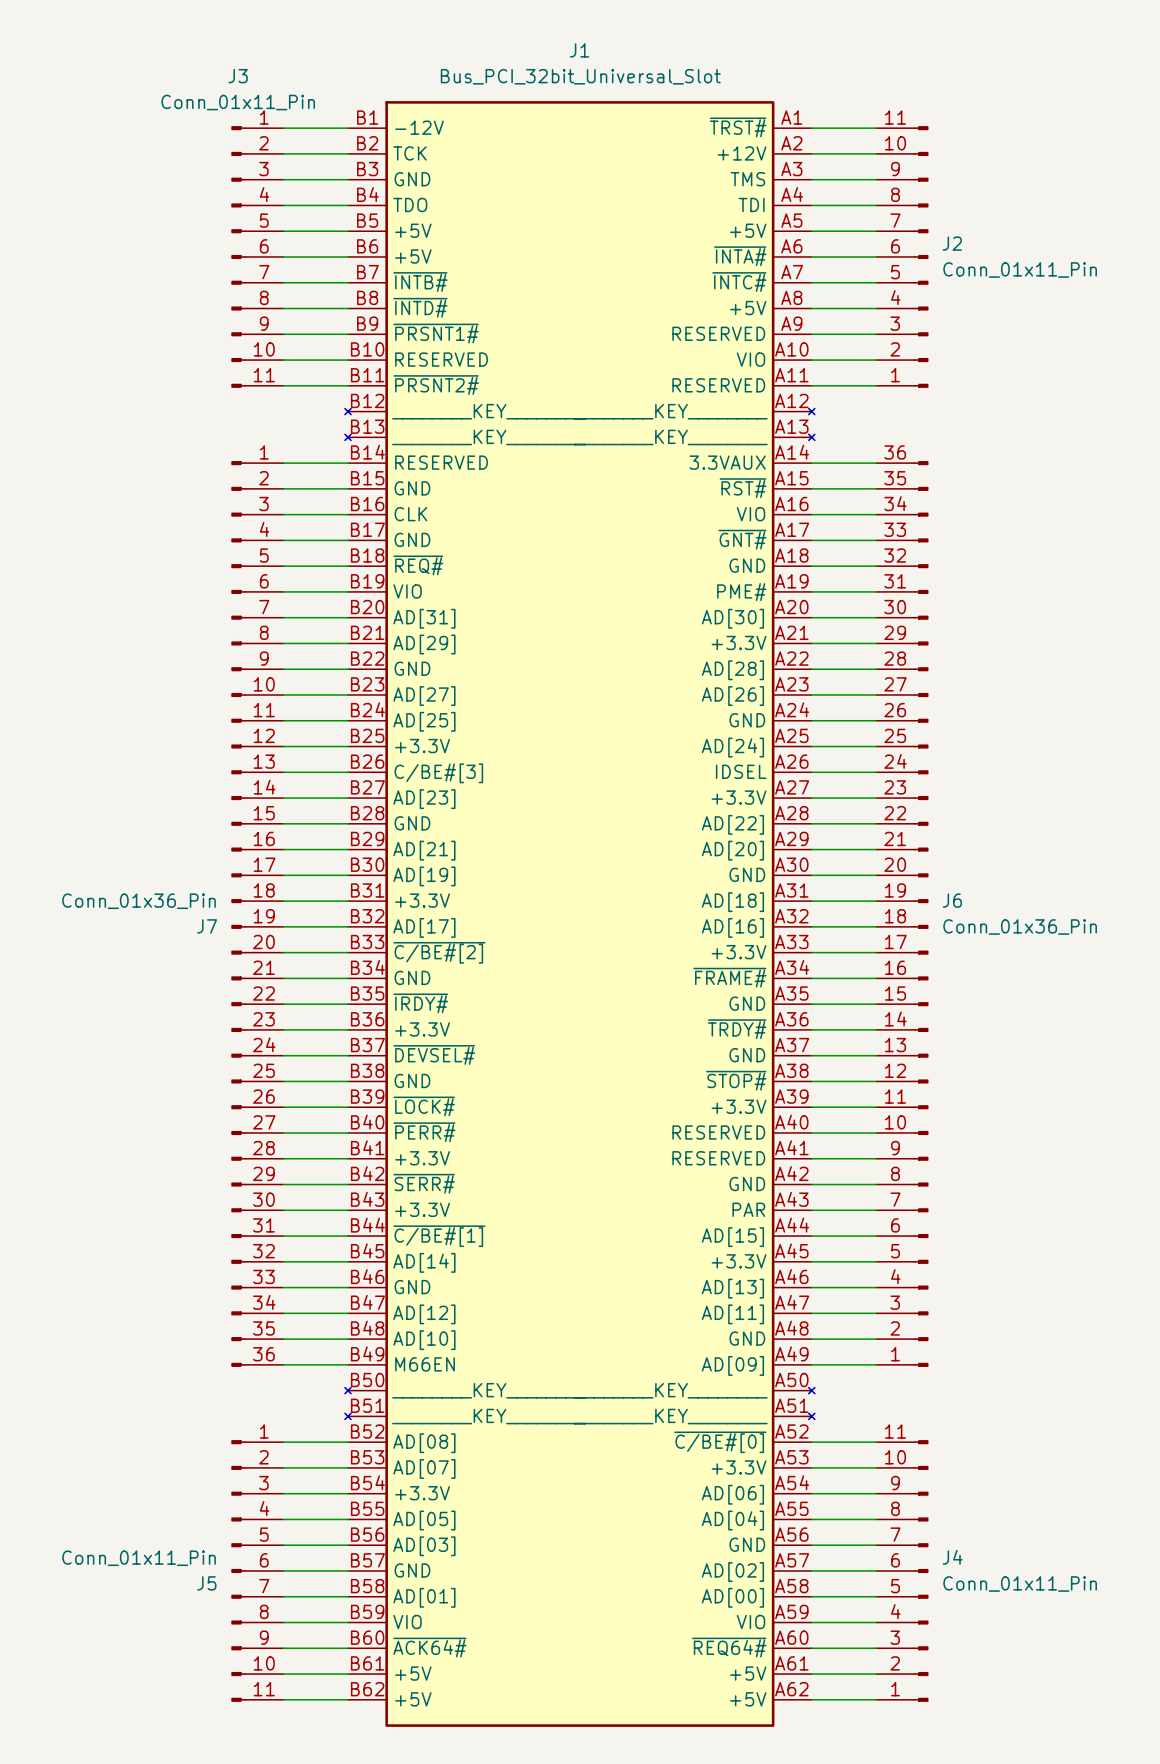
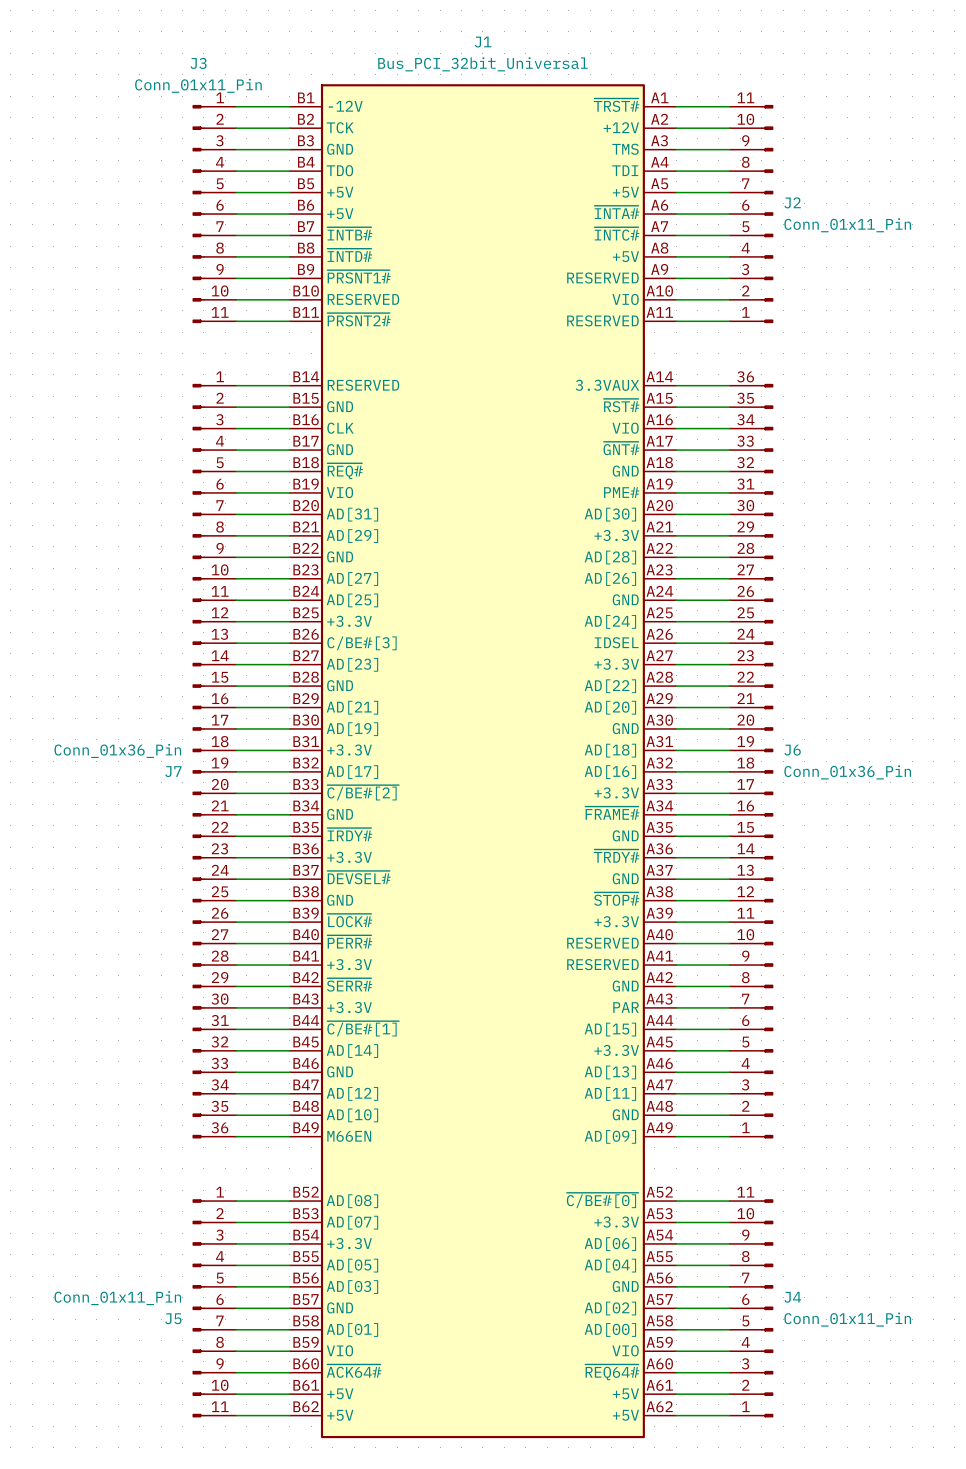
J1 value: Bus_PCI_32bit_Universal_Slot (580, 76) -> Bus_PCI_32bit_Universal (482, 64)
J1 symbol: [344, 101, 815, 1727] -> [289, 84, 677, 1439]

